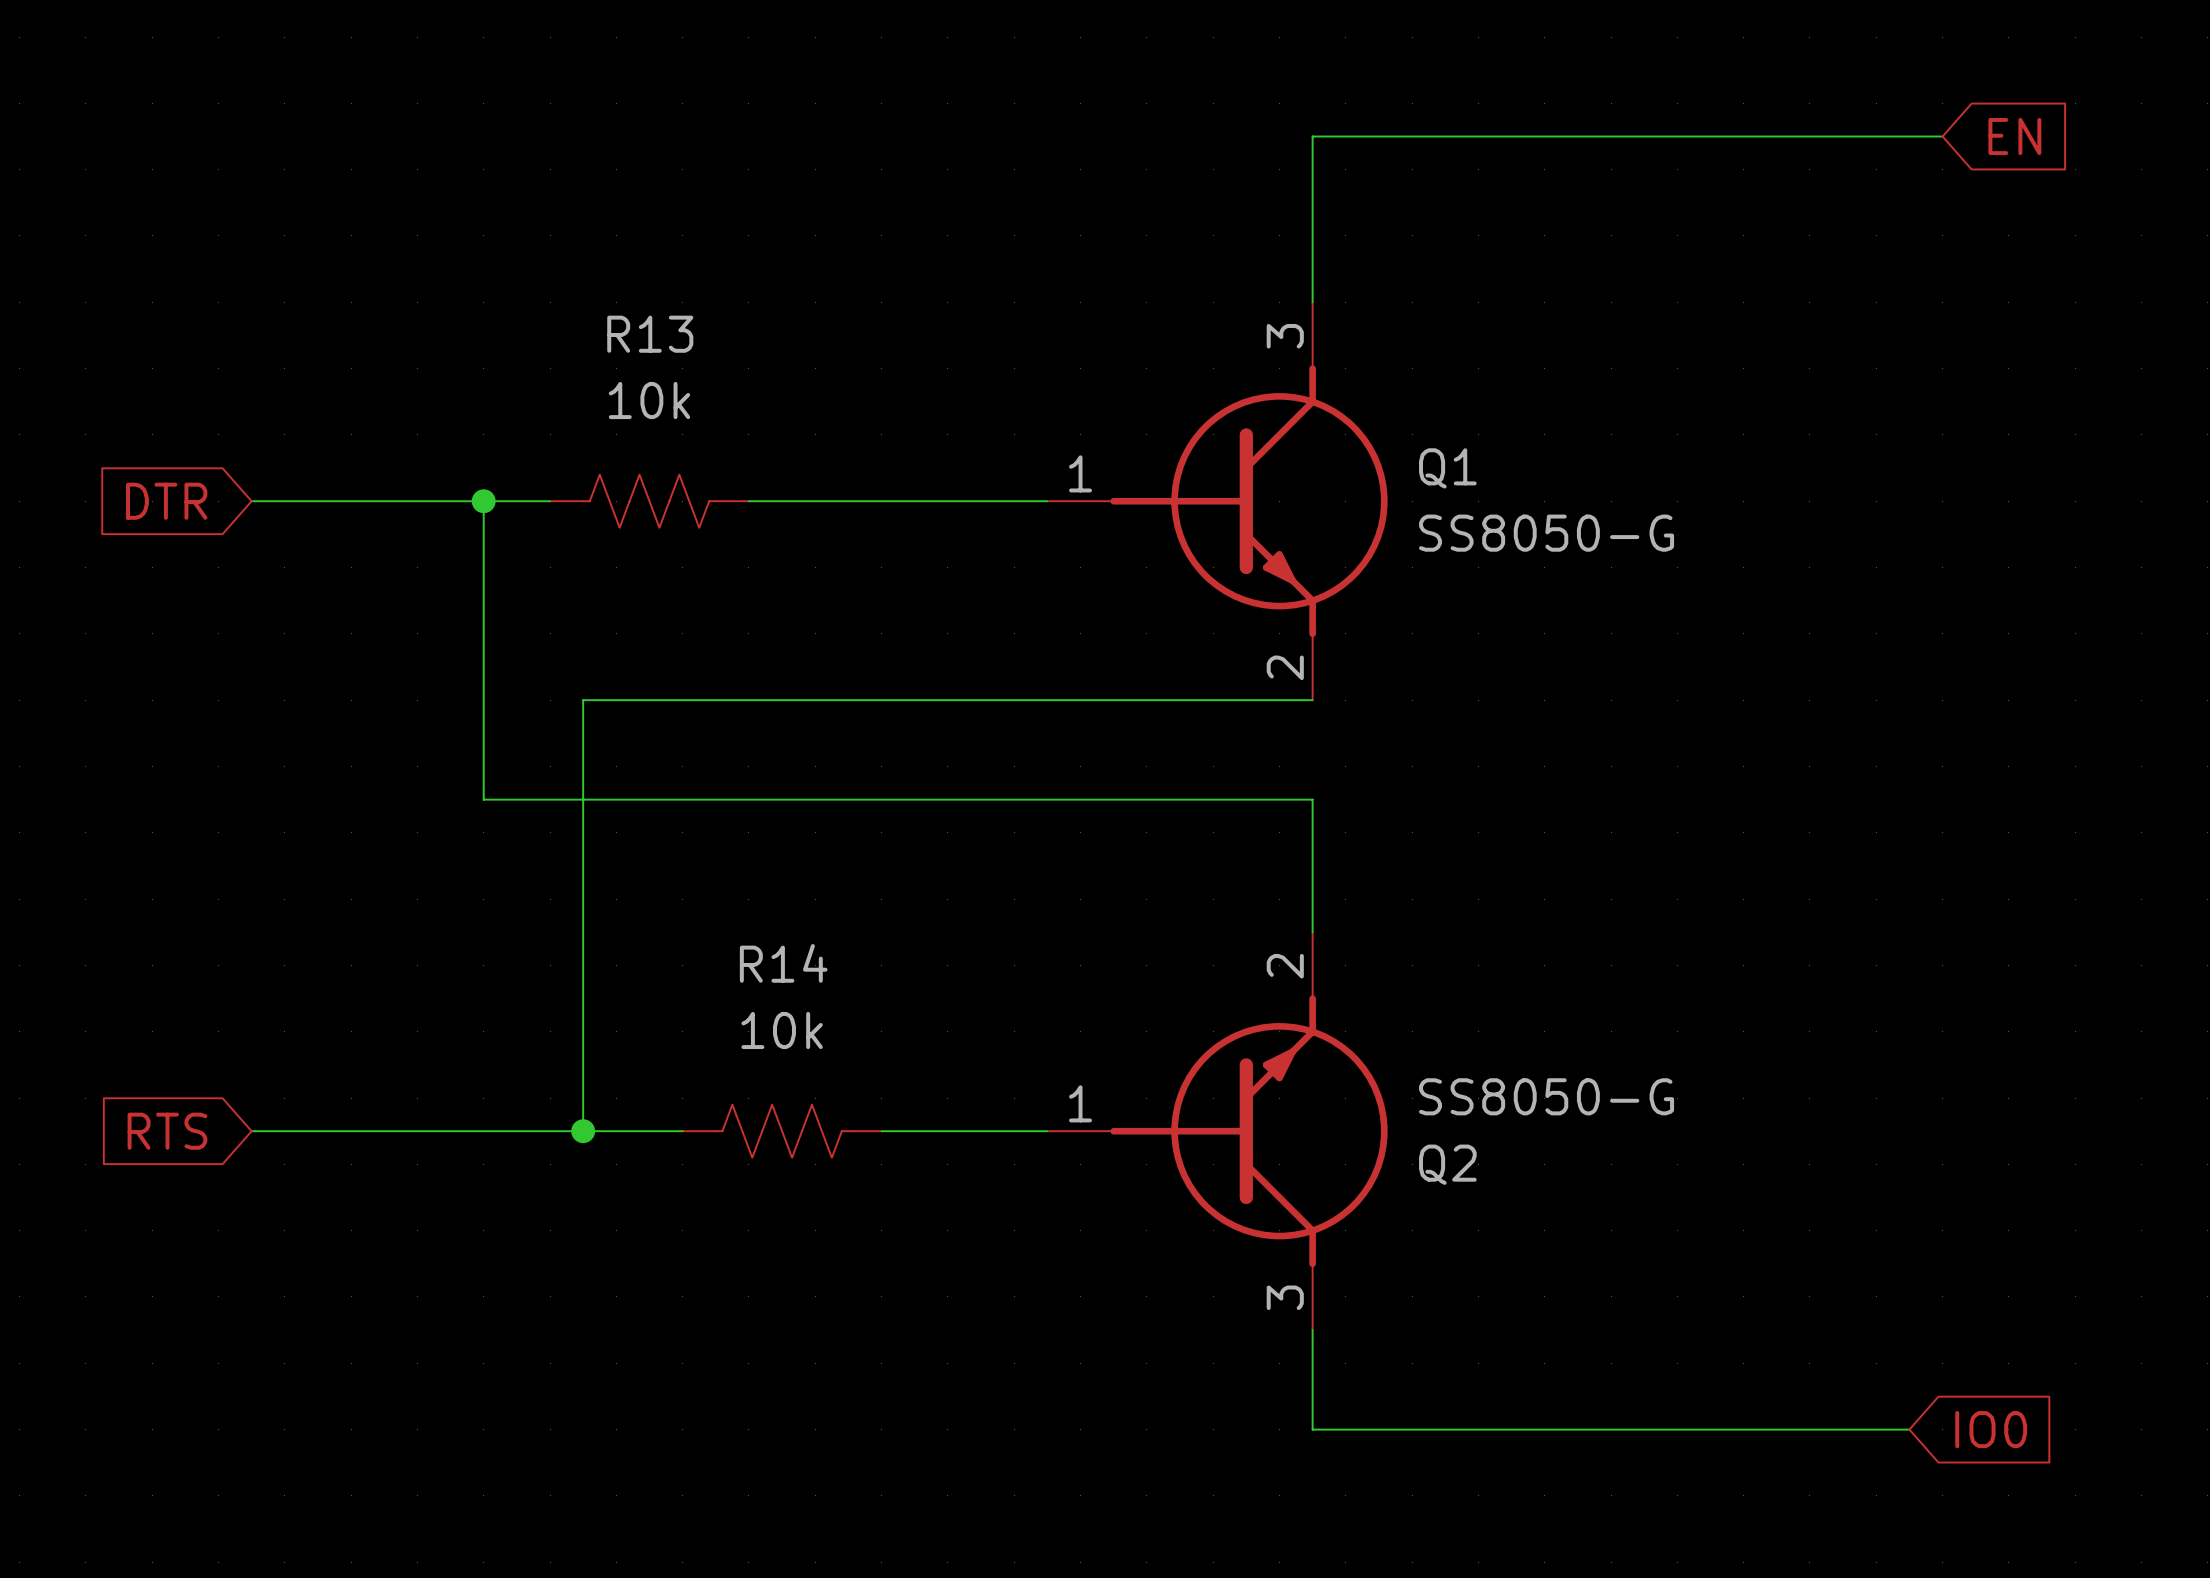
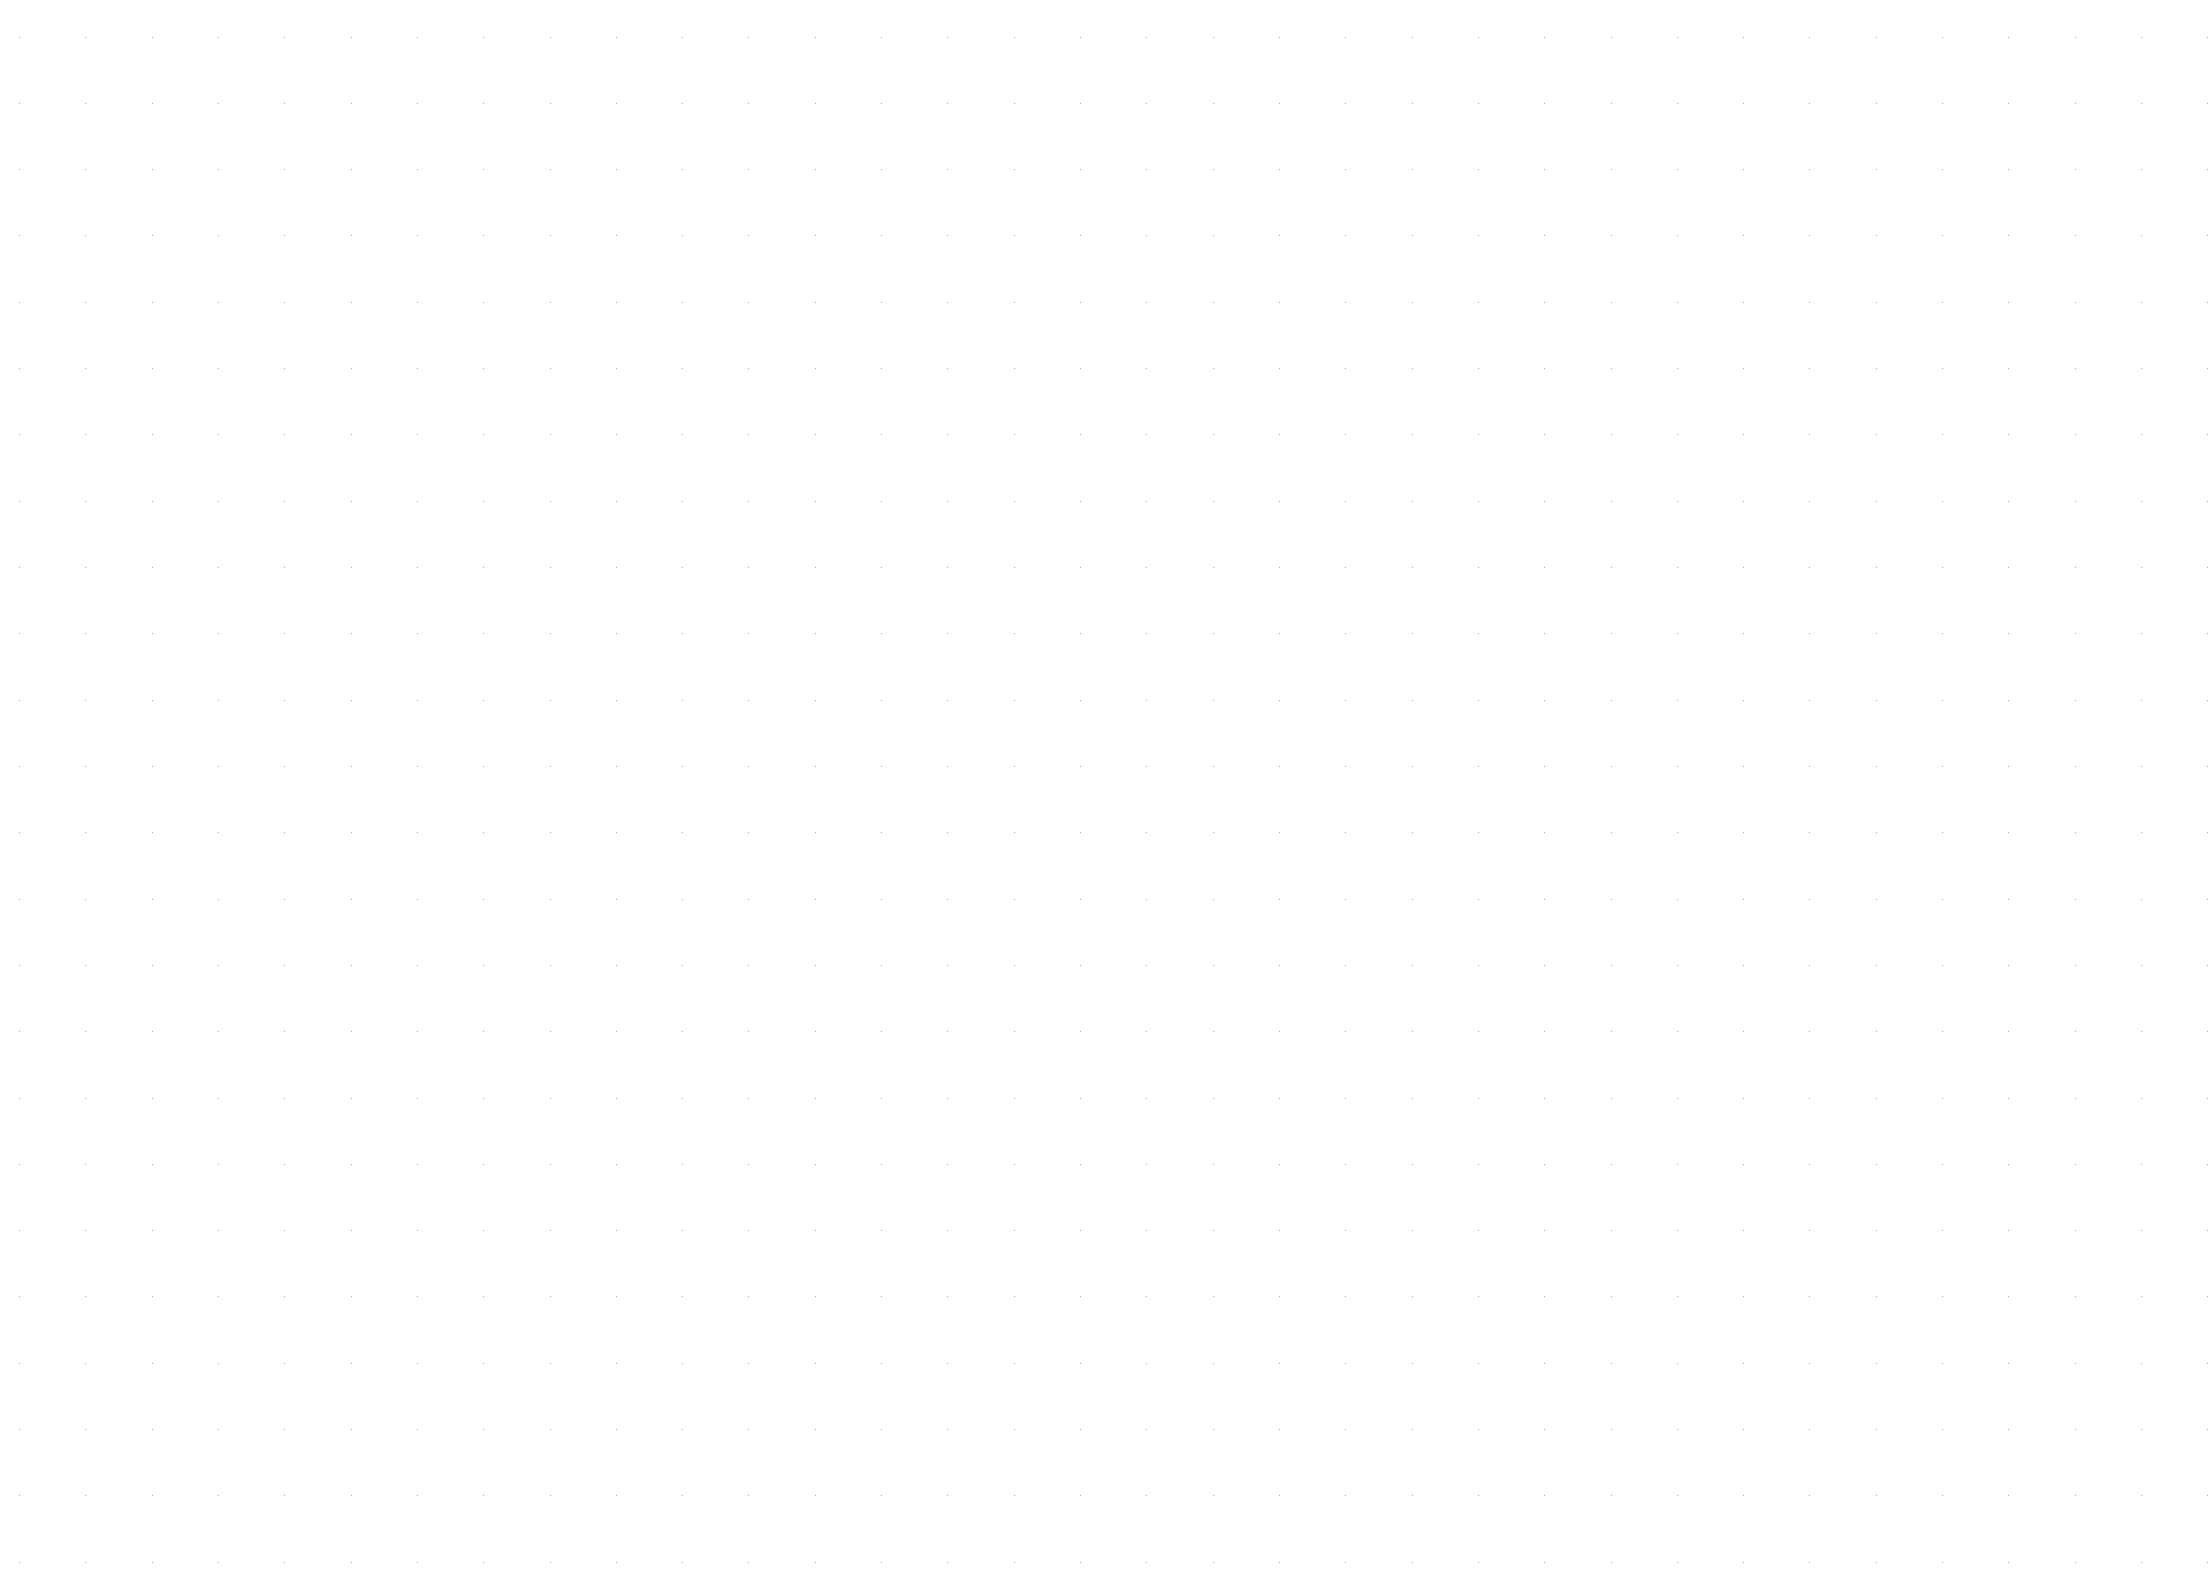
wire: (1942, 136) (1312, 136) (1312, 302) -> none
global label: EN (2014, 136) -> none
global label: DTR (166, 501) -> none
wire: (251, 501) (550, 501) -> none
wire: (483, 501) (483, 799) (1312, 799) (1312, 932) -> none
junction: (483, 501) -> none
R13: 10k (649, 501) -> none
wire: (748, 501) (1047, 501) -> none
Q1: SS8050-G (1217, 501) -> none
wire: (1312, 700) (583, 700) (583, 1131) -> none
global label: RTS (167, 1131) -> none
wire: (251, 1131) (682, 1131) -> none
junction: (583, 1131) -> none
R14: 10k (782, 1131) -> none
wire: (881, 1131) (1047, 1131) -> none
Q2: SS8050-G (1217, 1131) -> none
wire: (1312, 1330) (1312, 1429) (1909, 1429) -> none
global label: IO0 (1991, 1429) -> none

